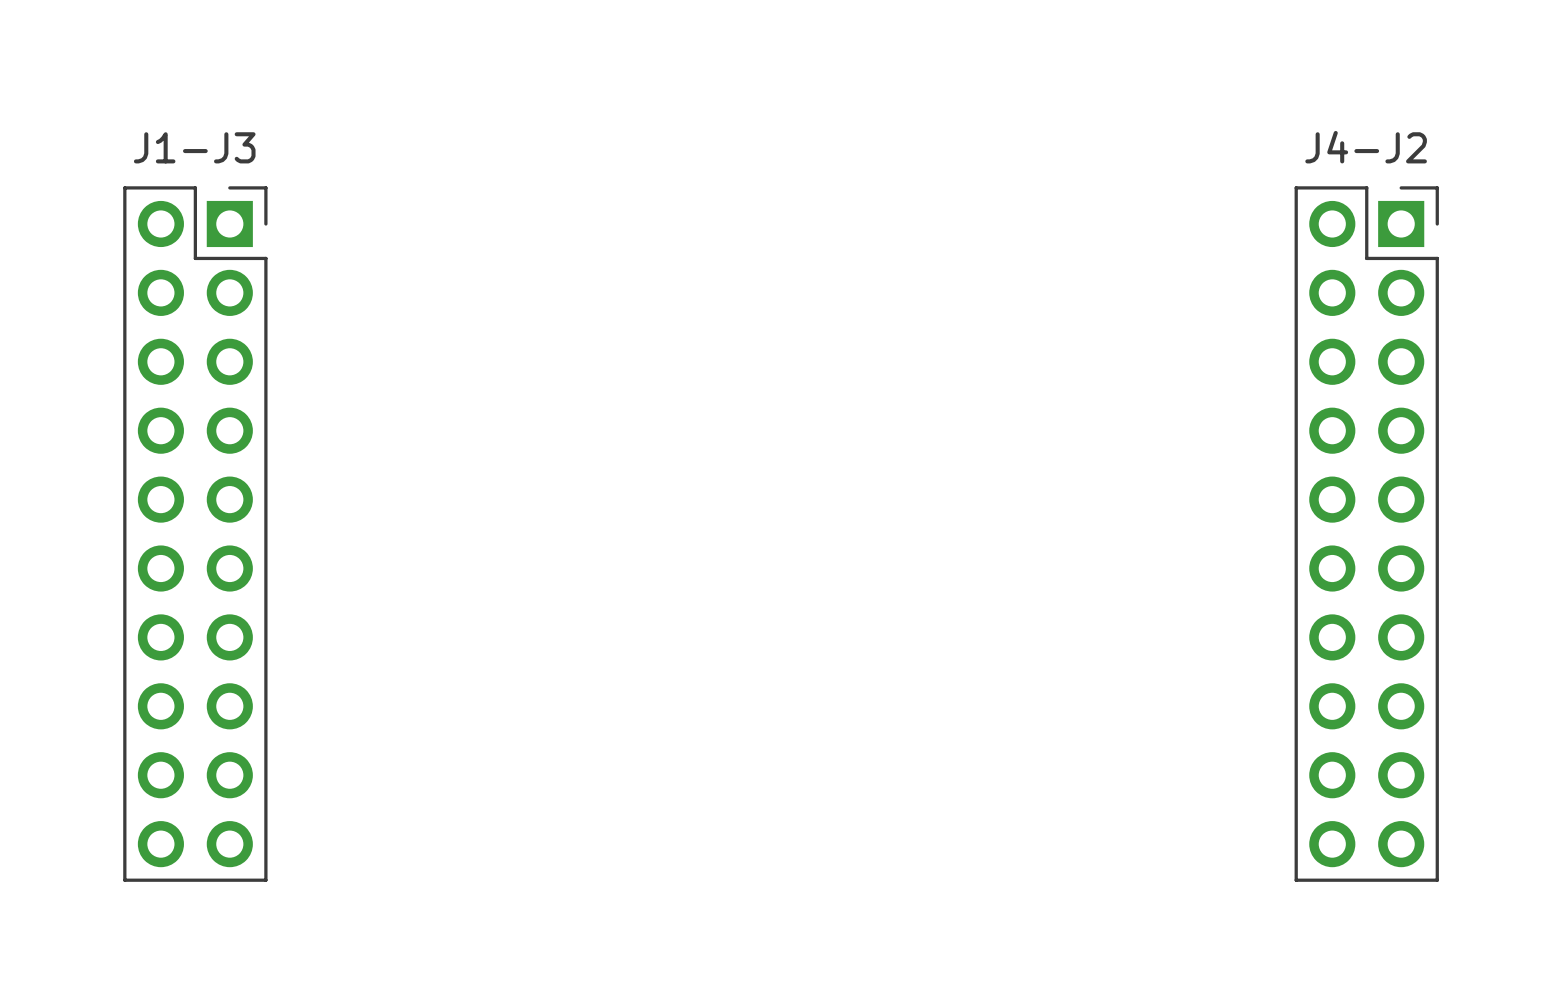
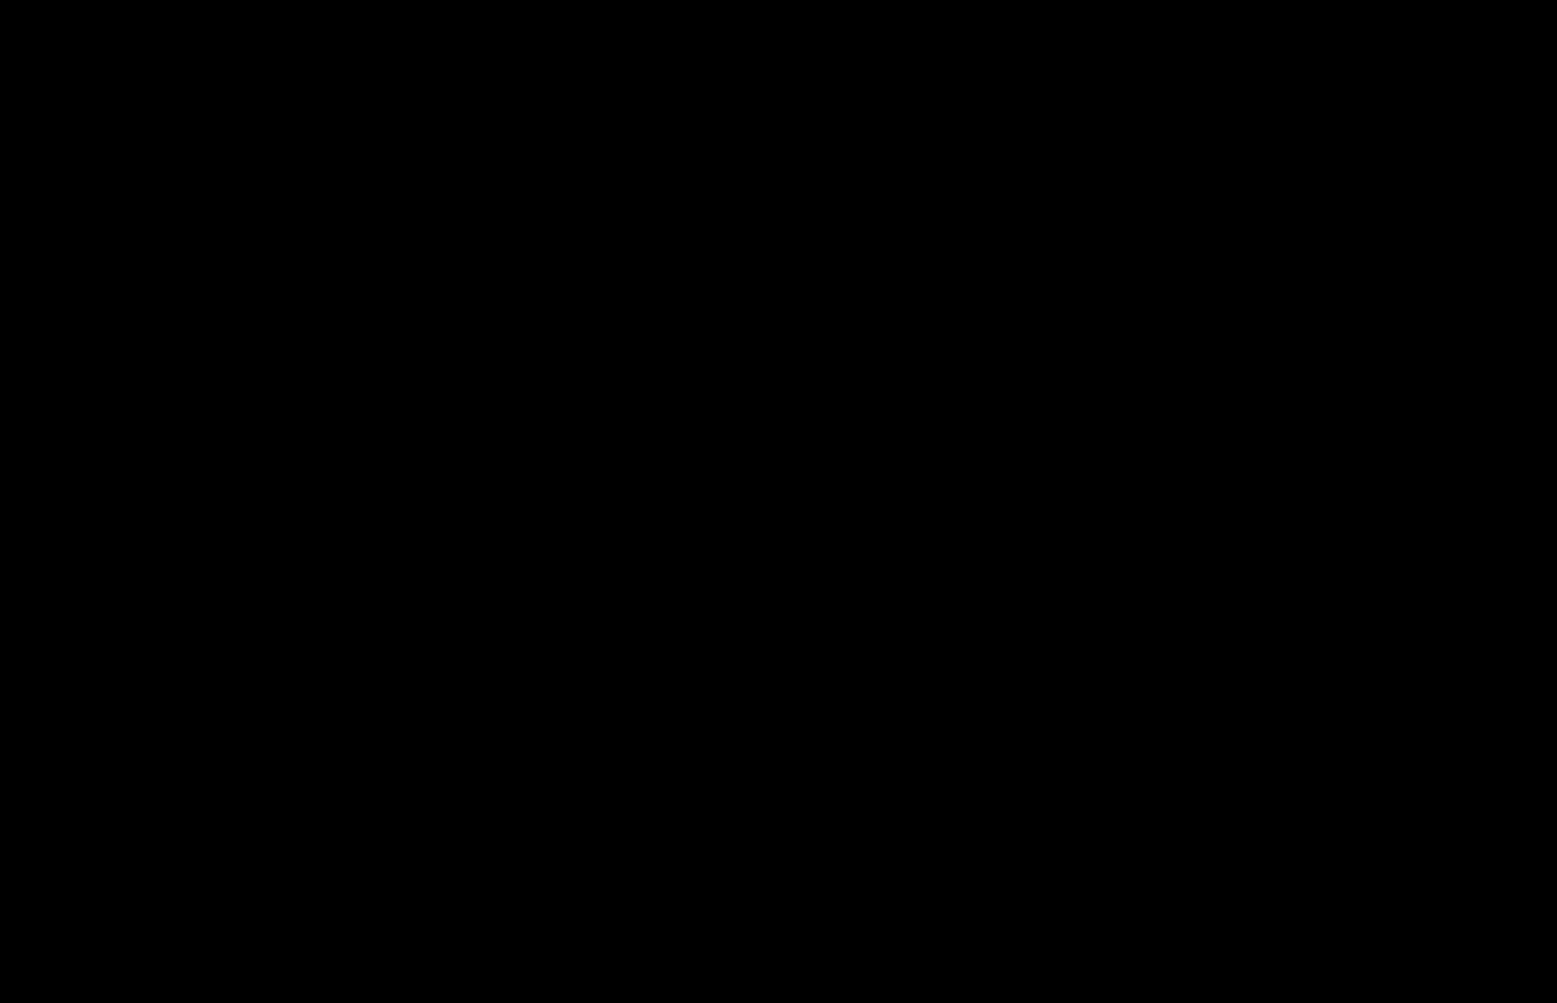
J1-J3: (195, 534) -> none
J4-J2: (1366, 534) -> none

